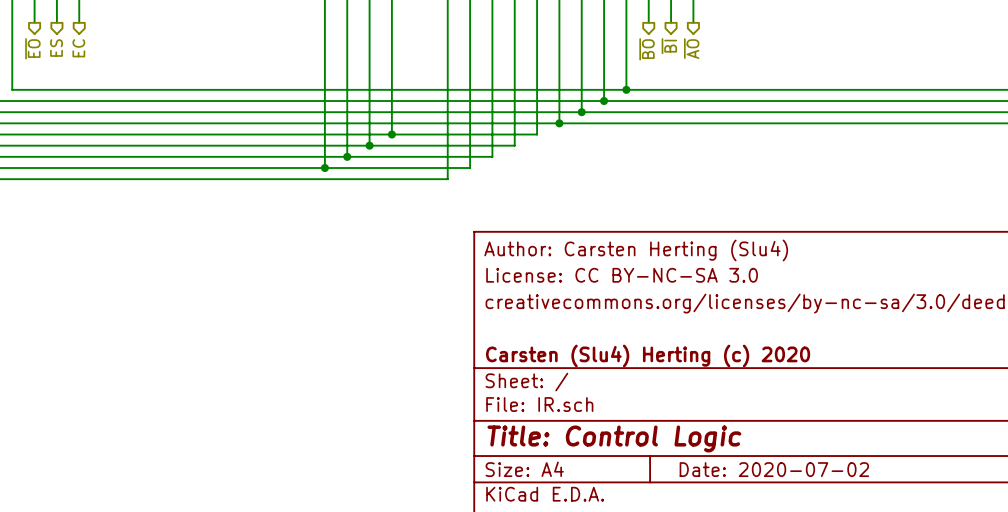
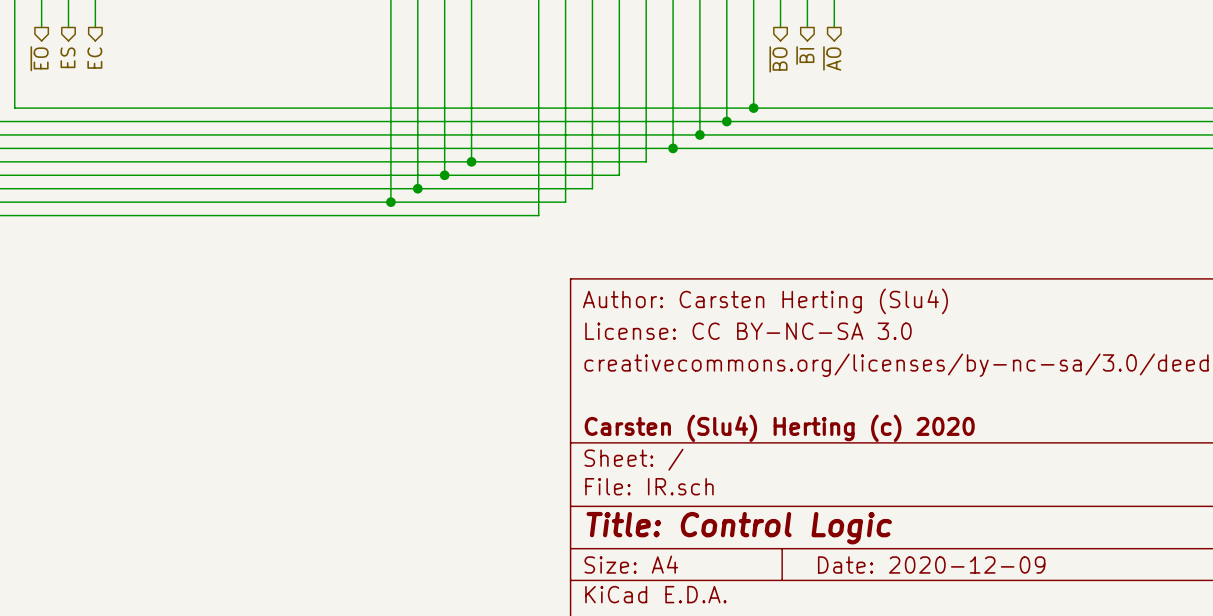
title block: Date: 2020-07-02 (774, 469) -> Date: 2020-12-09 (931, 565)

